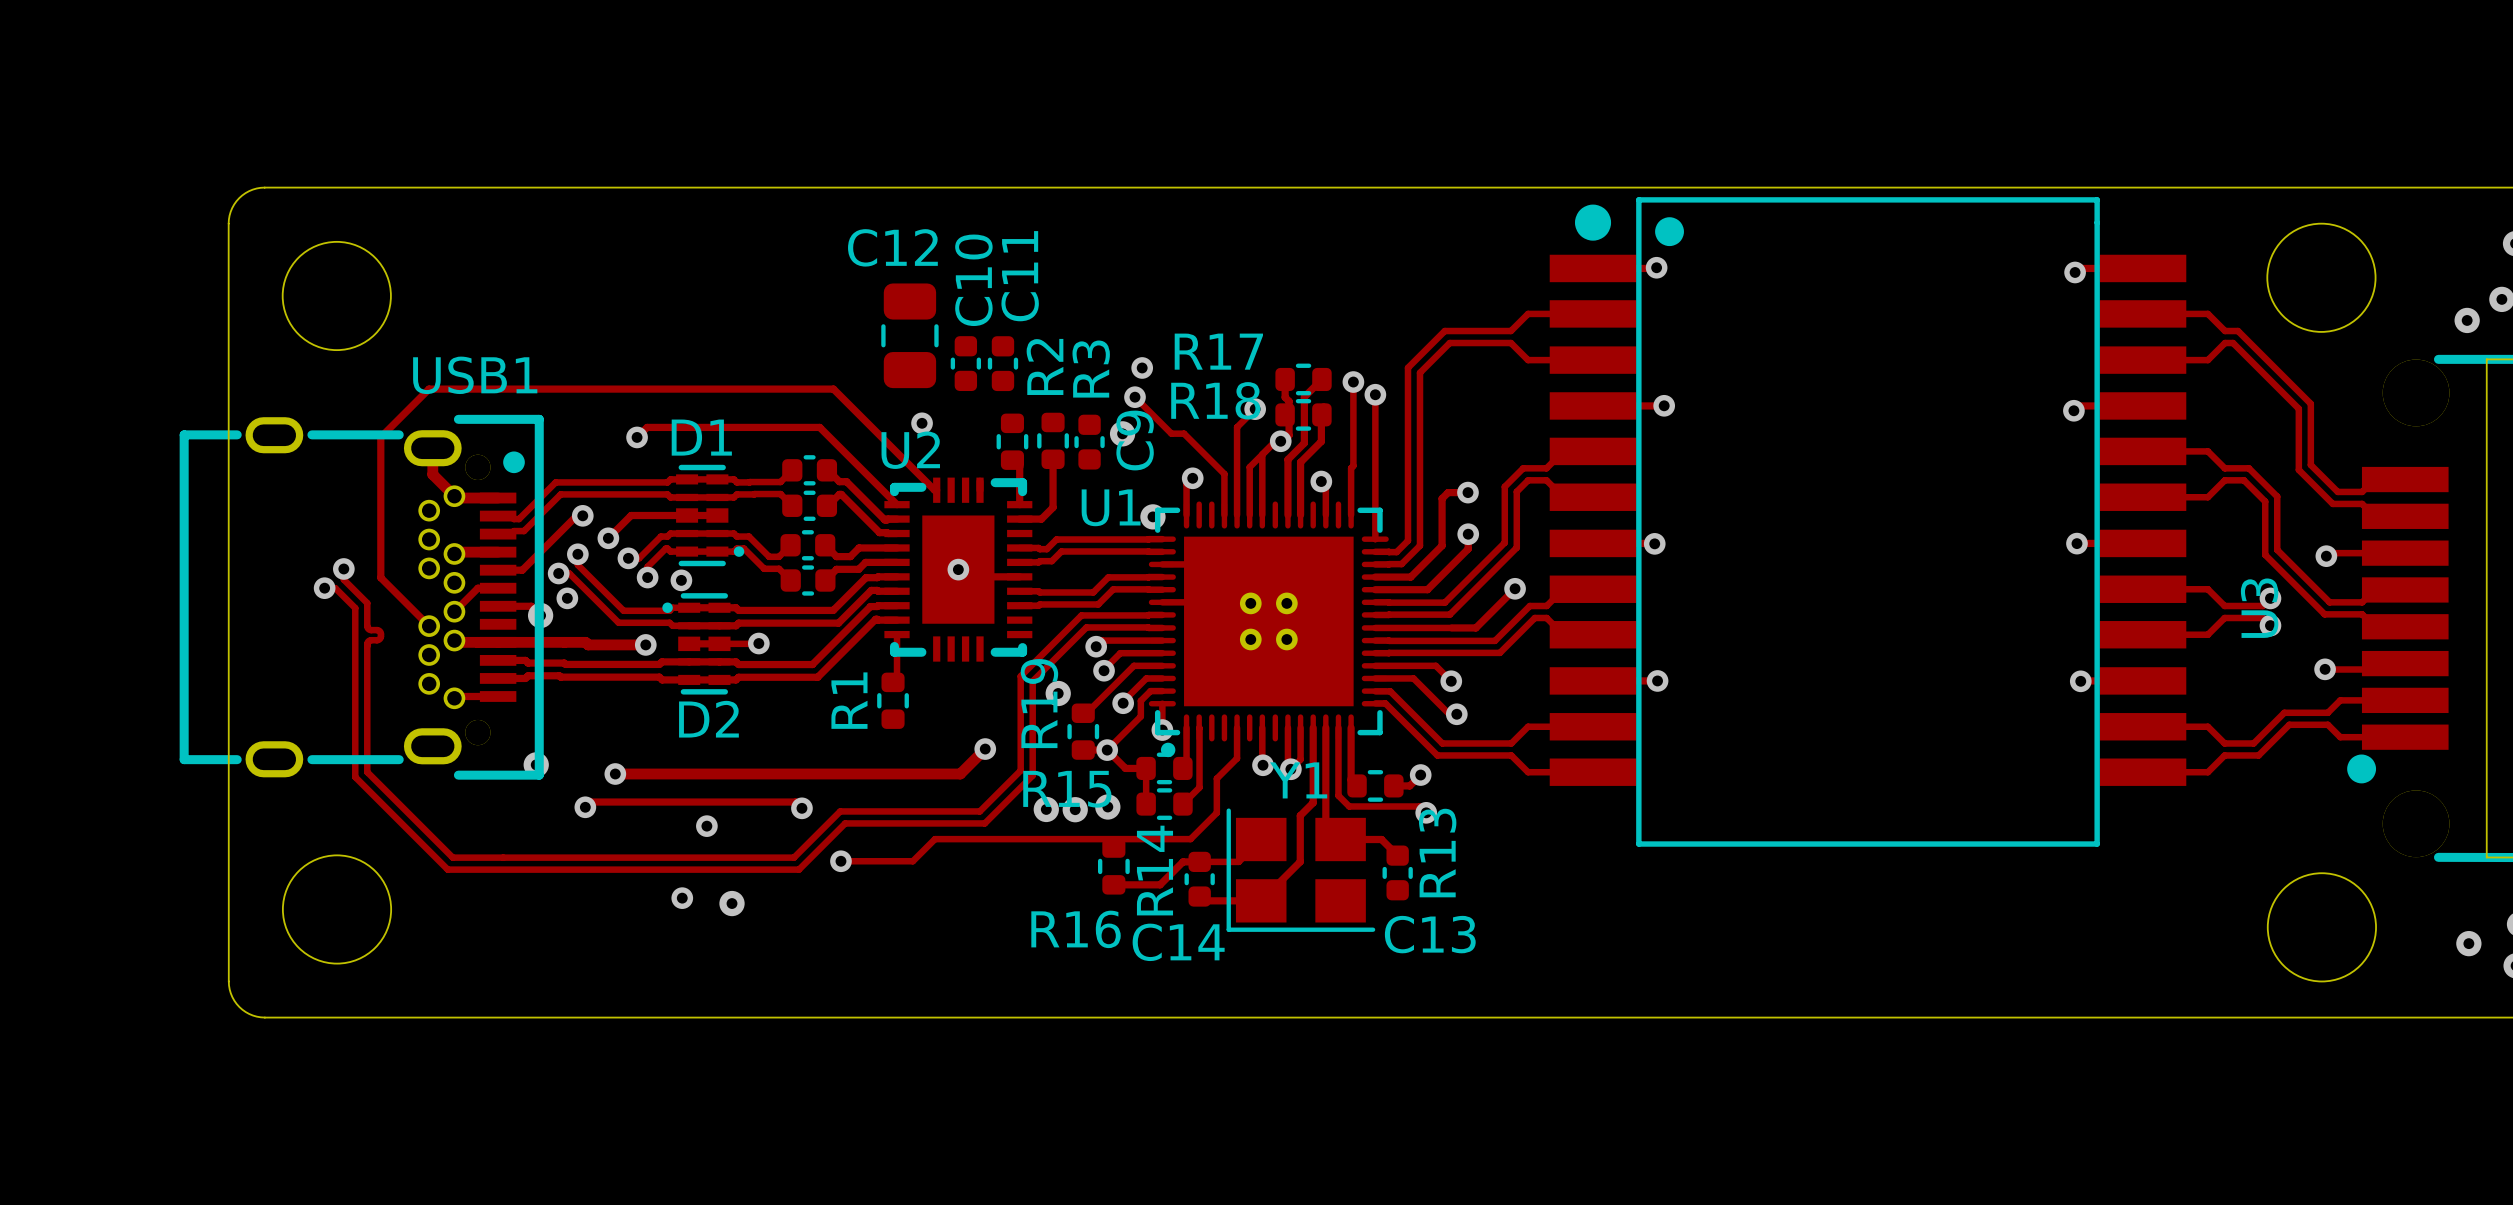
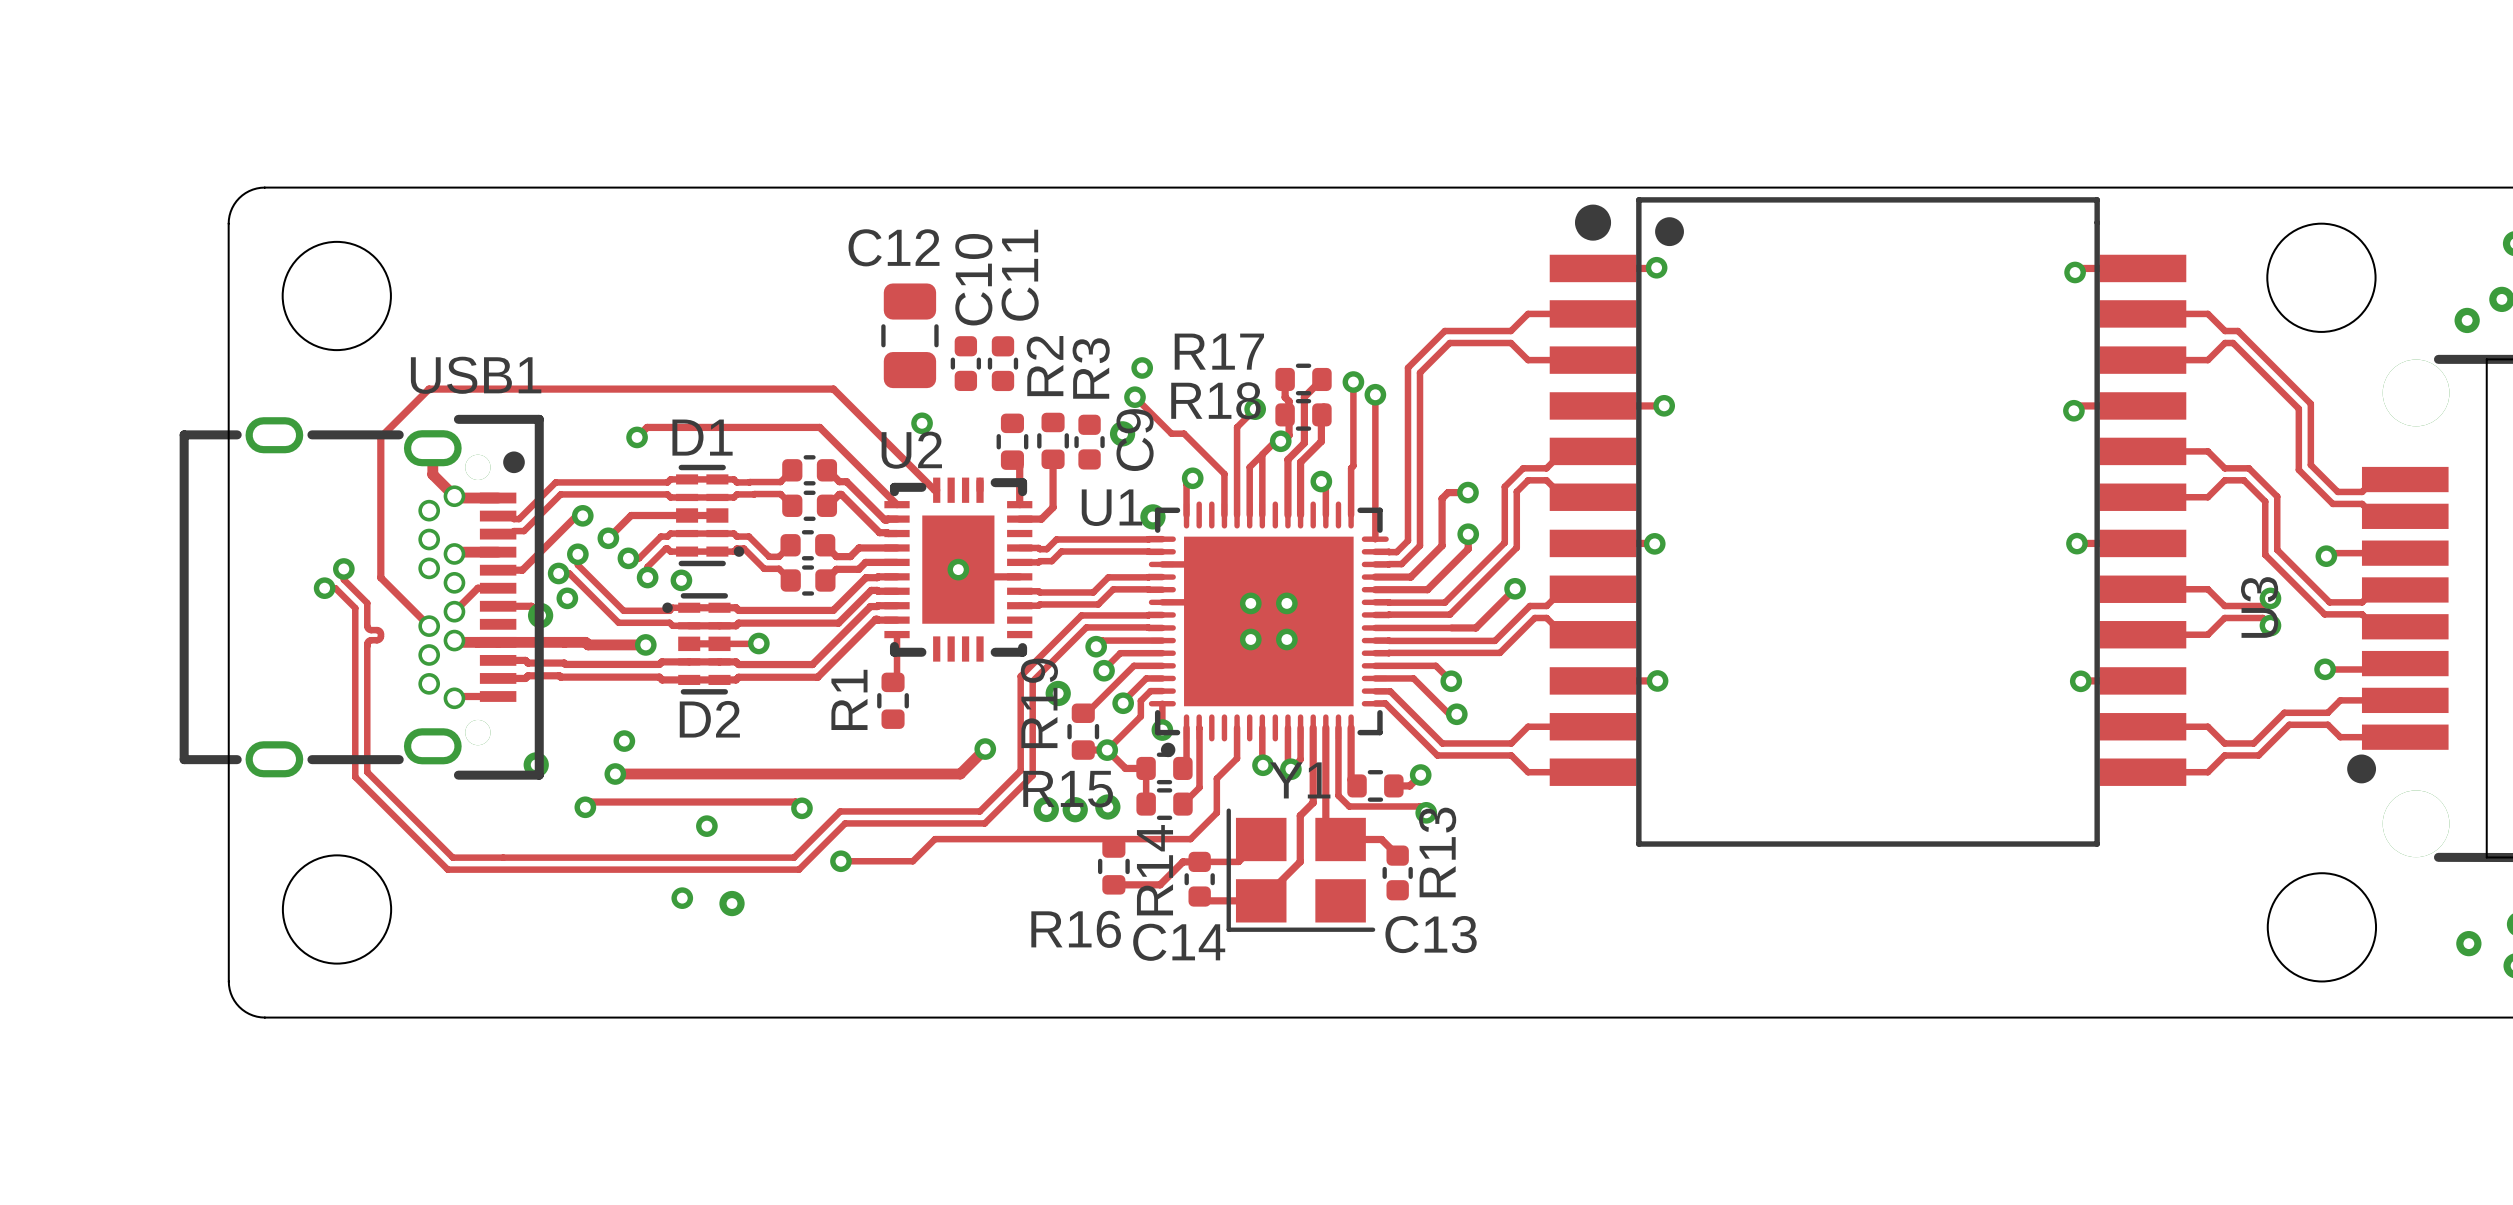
via: none -> (624, 741)

